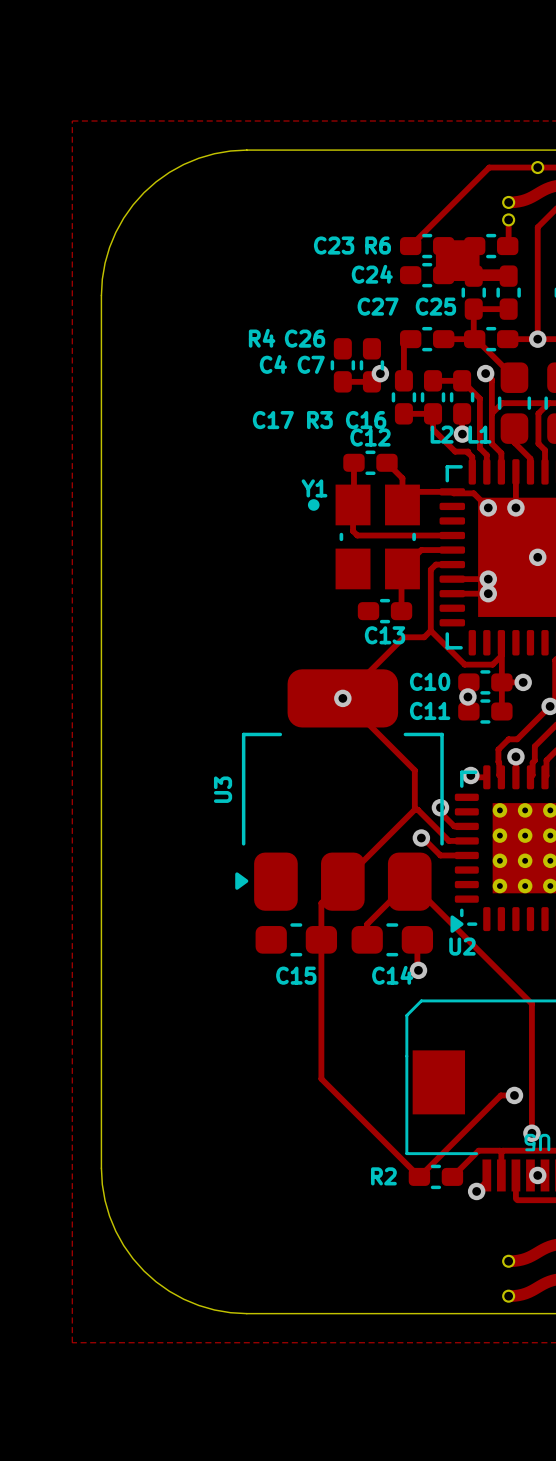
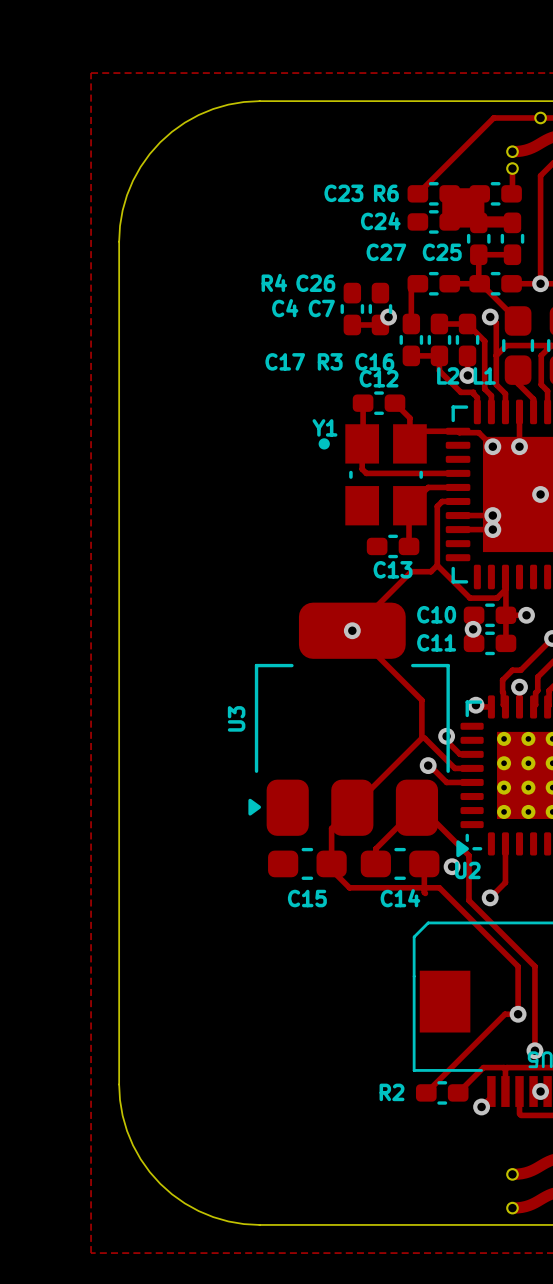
track: (409, 881) (531, 1003) (531, 1046) -> (416, 807) (421, 807) (468, 855) (468, 900) (534, 966)
track: none -> (505, 843) (505, 882) (490, 897)
via: none -> (452, 866)
track: (321, 946) (321, 1078) (419, 1176) -> (331, 869) (349, 887) (439, 887) (518, 966) (518, 1014)
via: (418, 970) -> none
via: none -> (490, 897)

